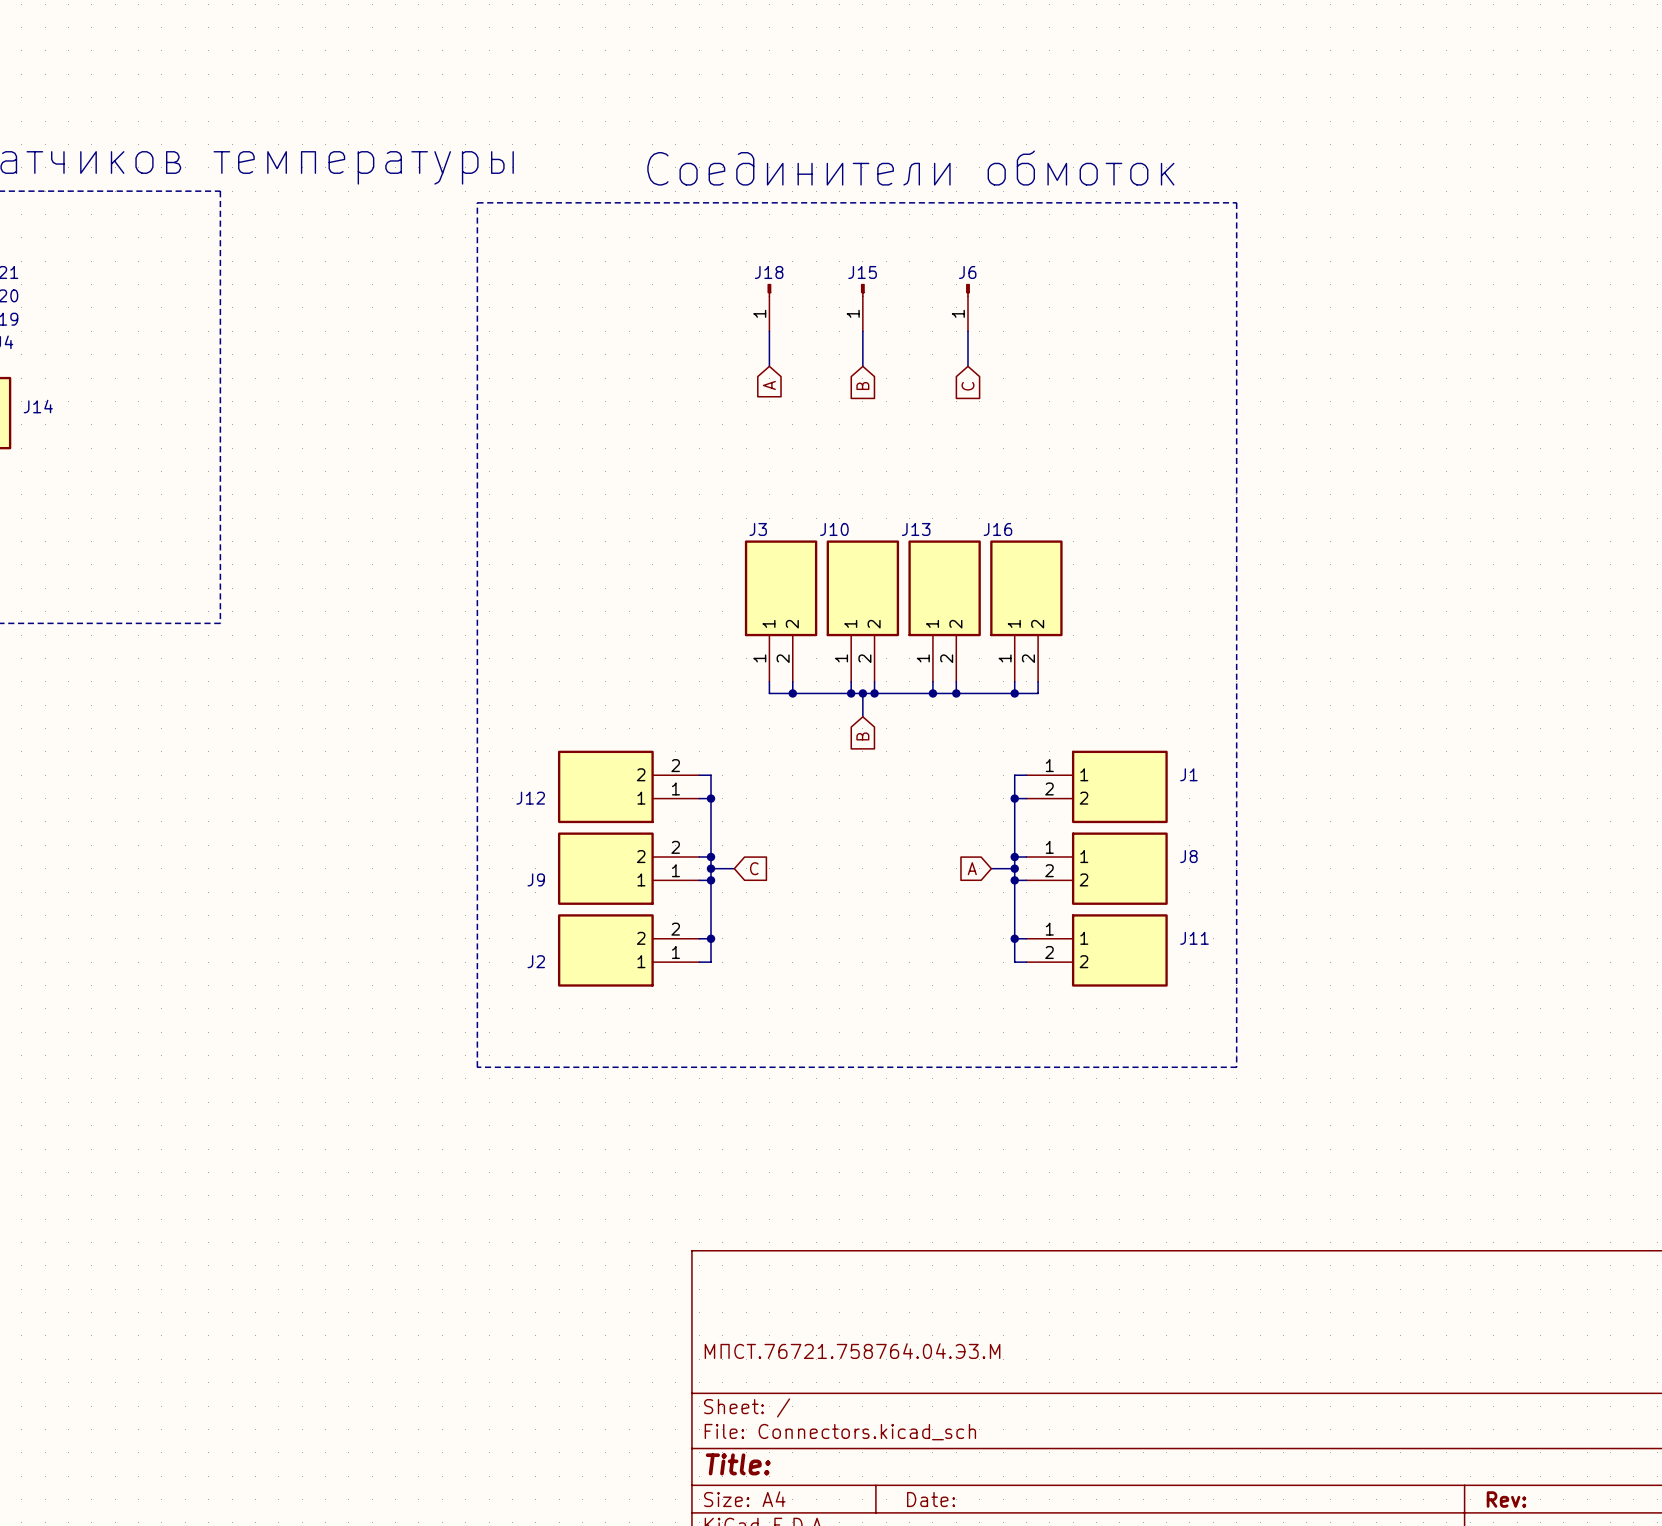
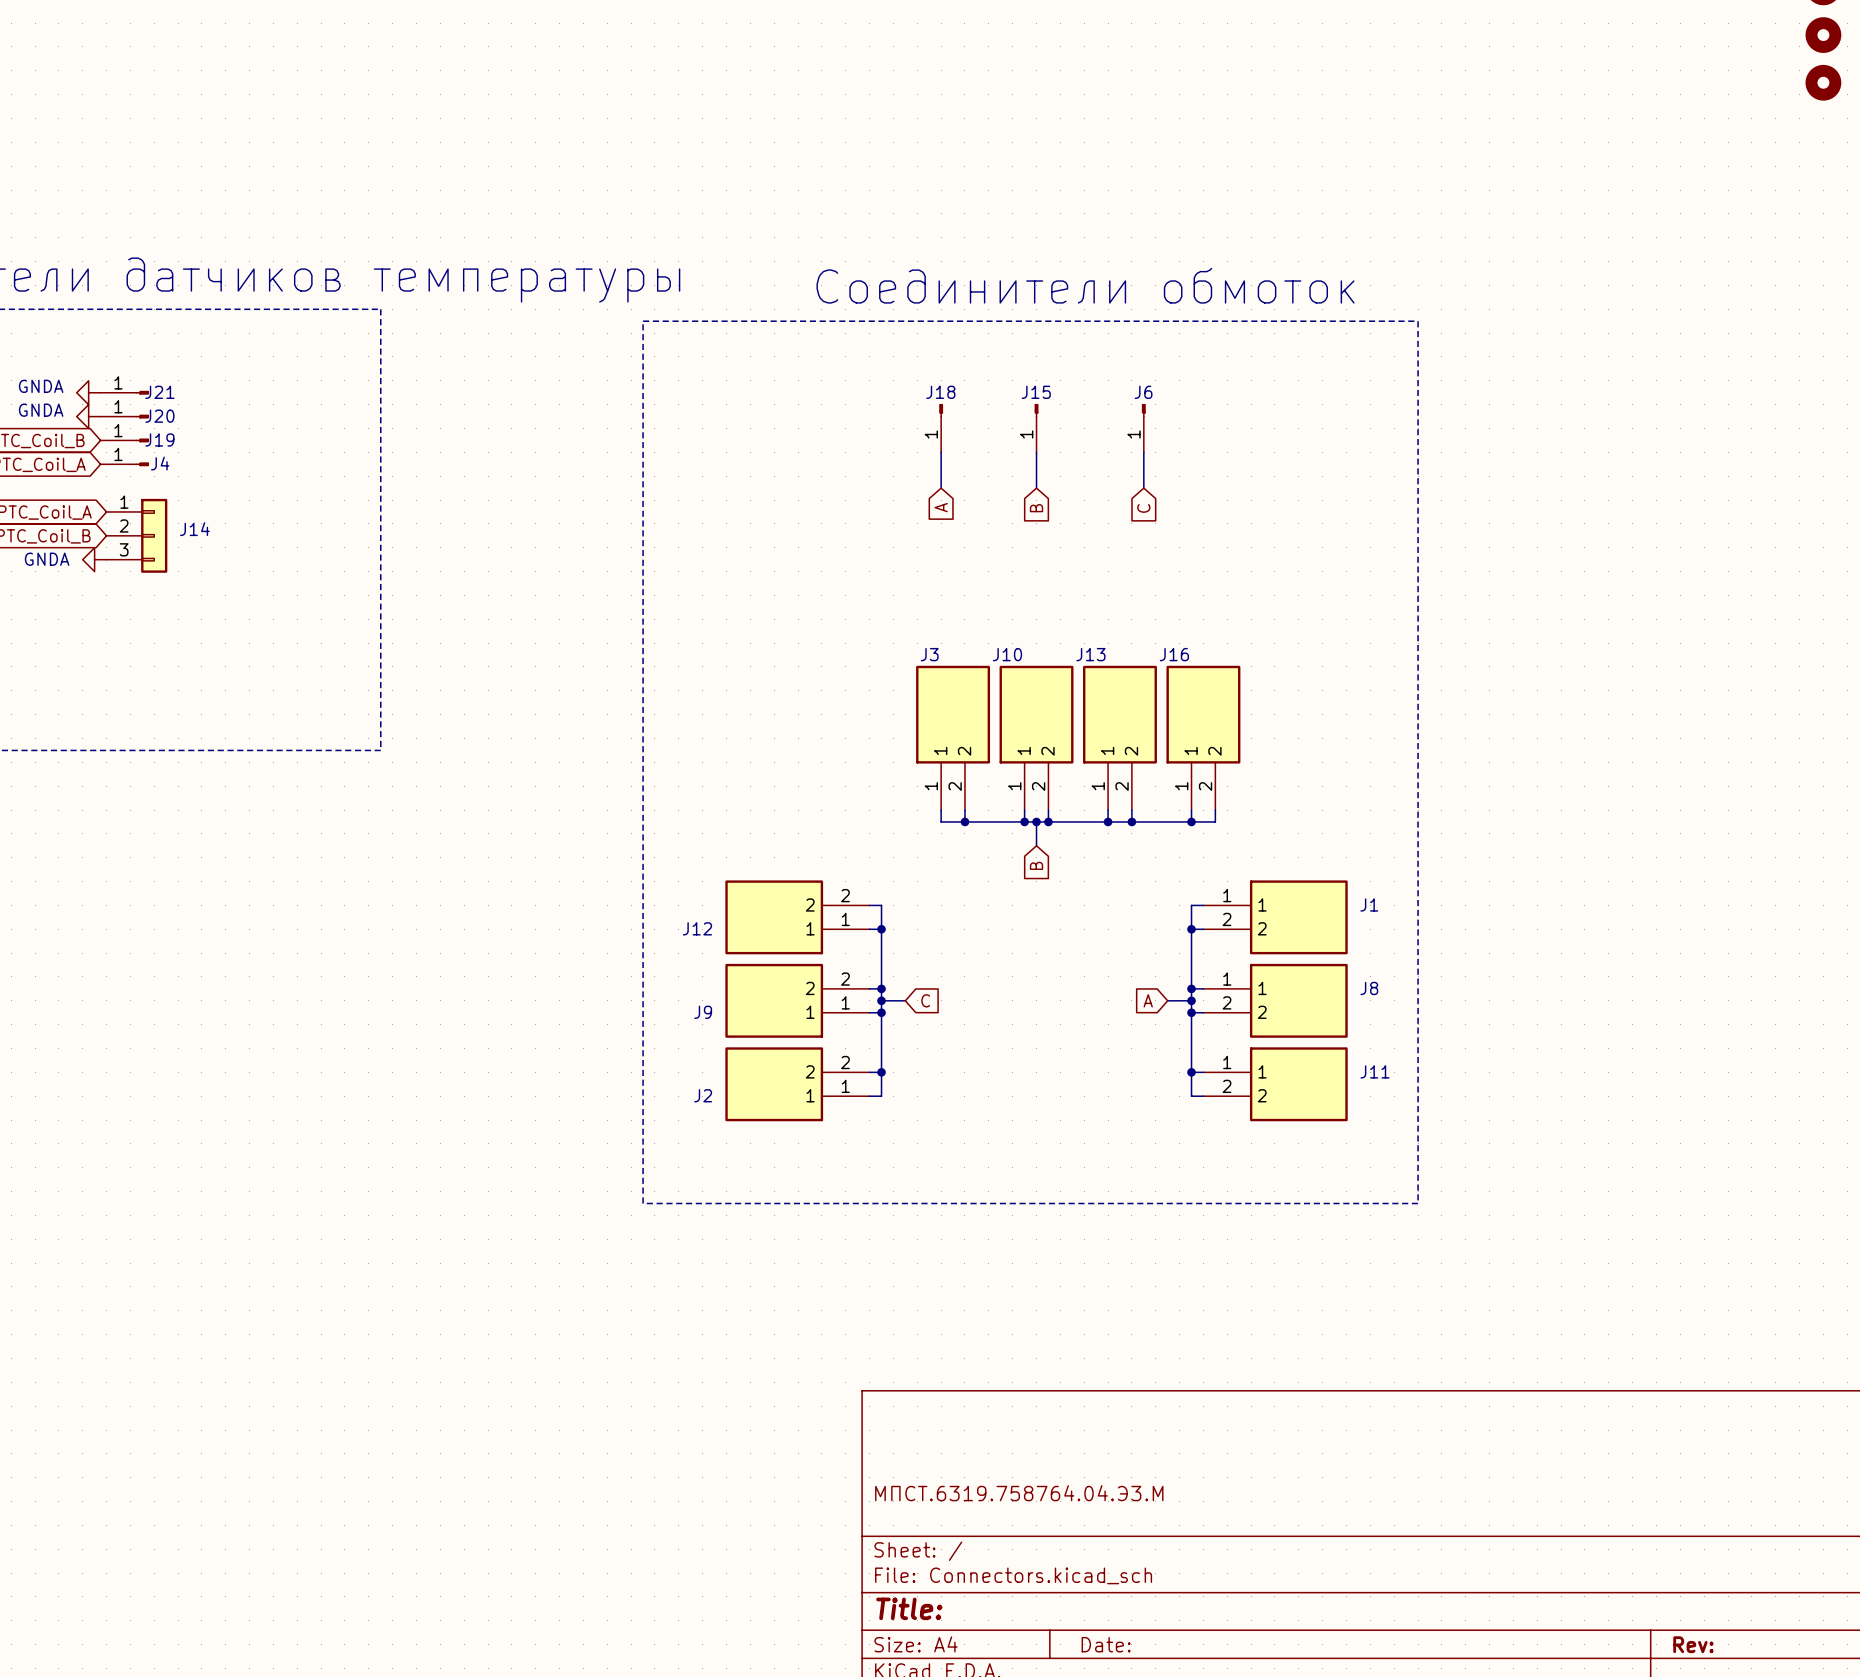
title block: МПСТ.76721.758764.04.Э3.М (852, 1351) -> МПСТ.6319.758764.04.Э3.М (1019, 1493)

